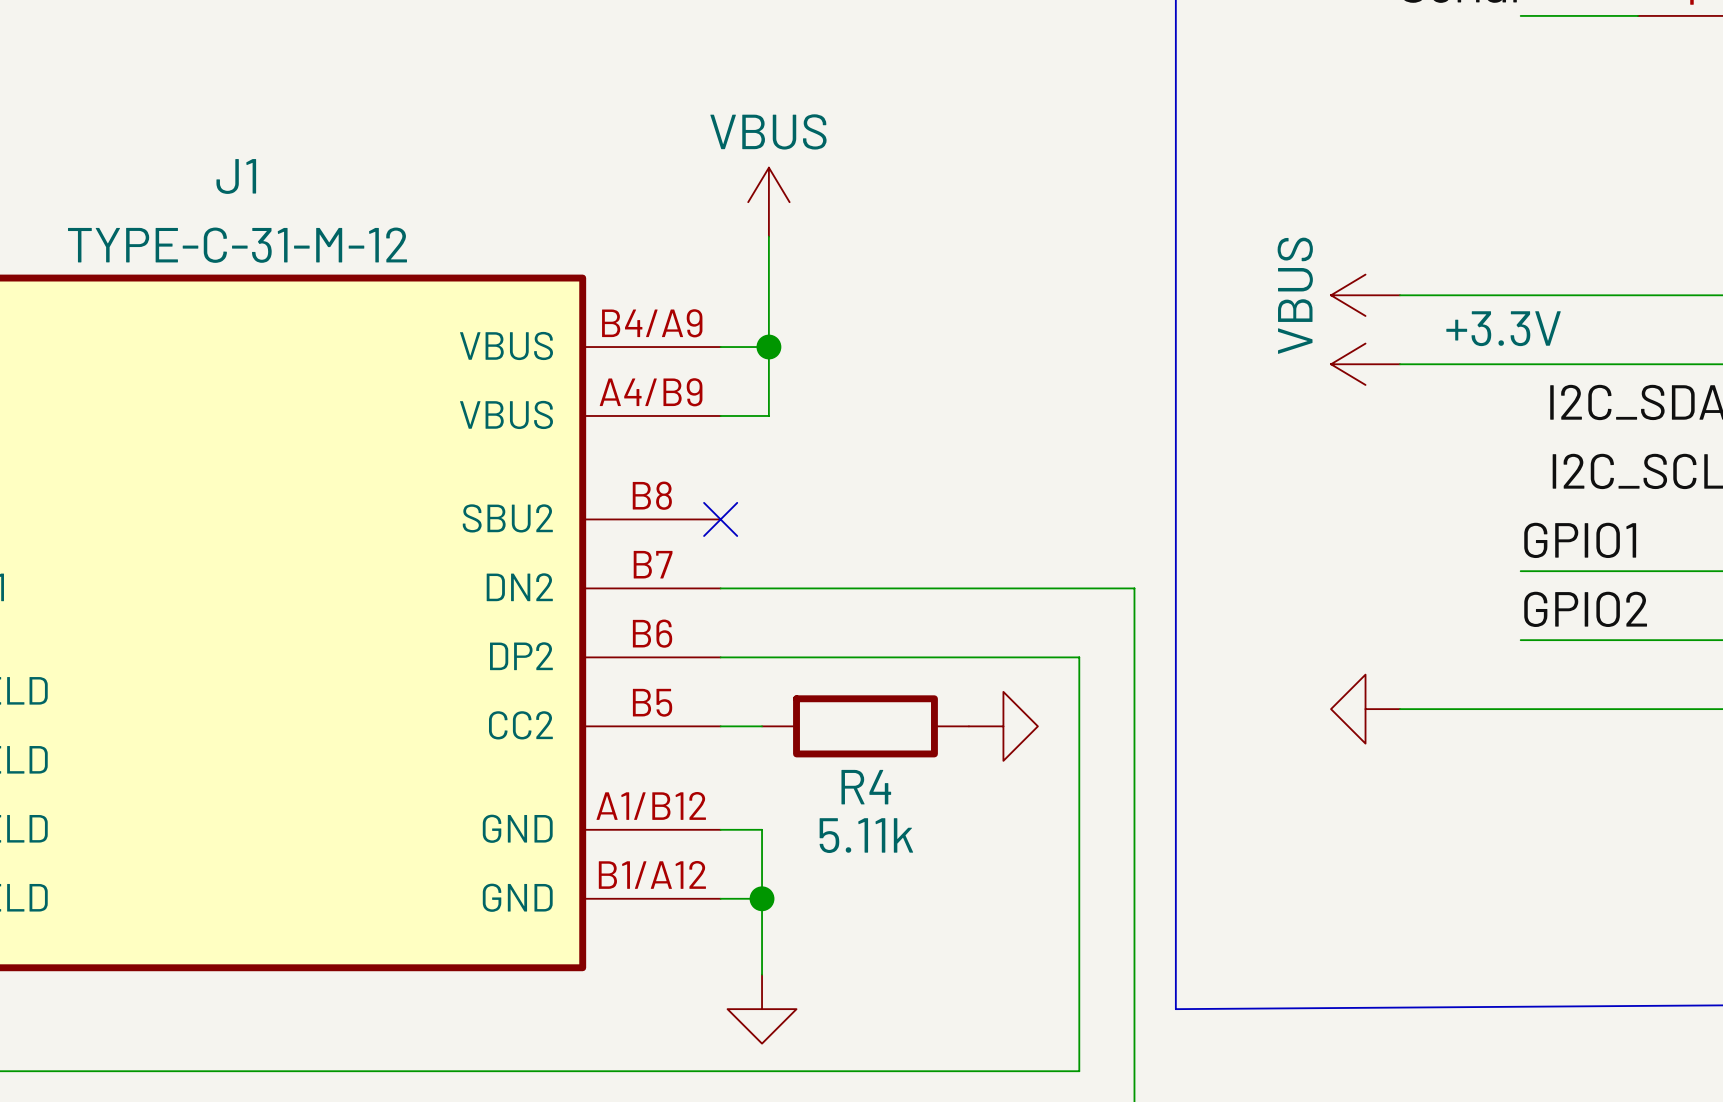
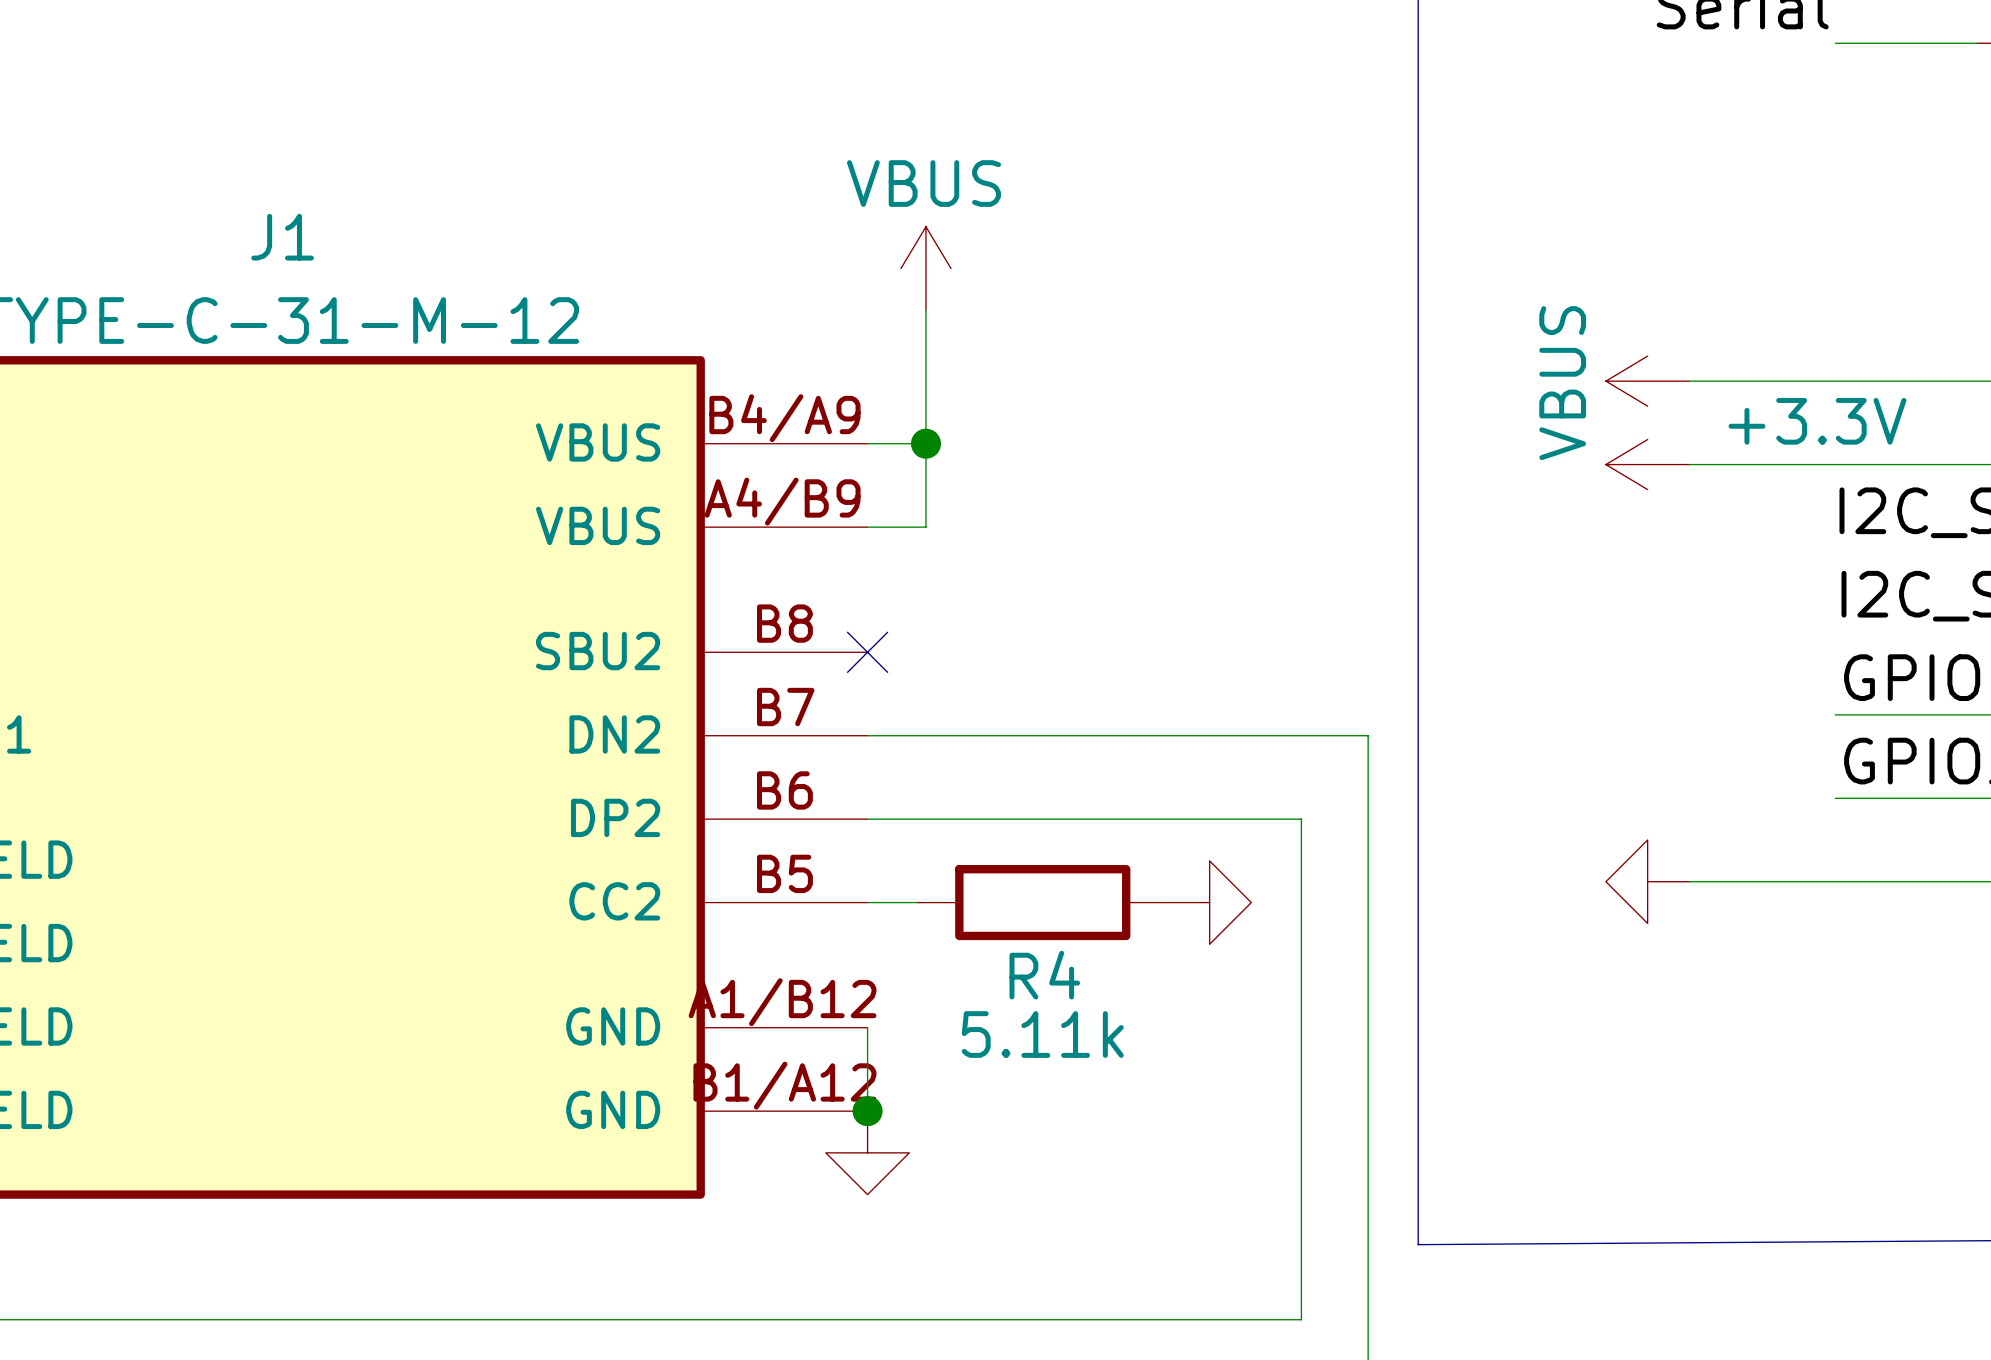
wire: (720, 829) (762, 829) (762, 974) -> none
wire: (720, 898) (762, 898) -> (867, 1111) (867, 1027)
junction position: (762, 898) -> (867, 1111)
power symbol position: (762, 1009) -> (867, 1152)

